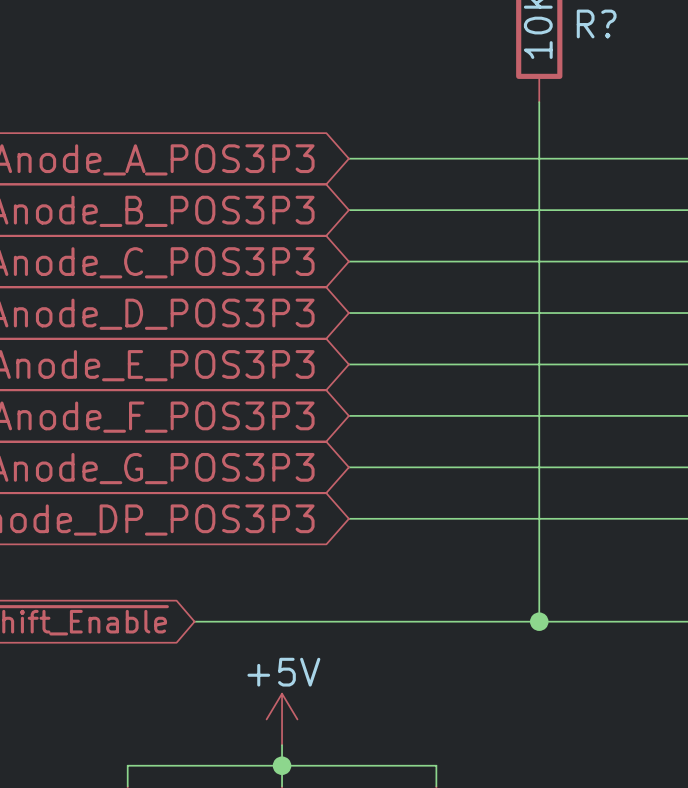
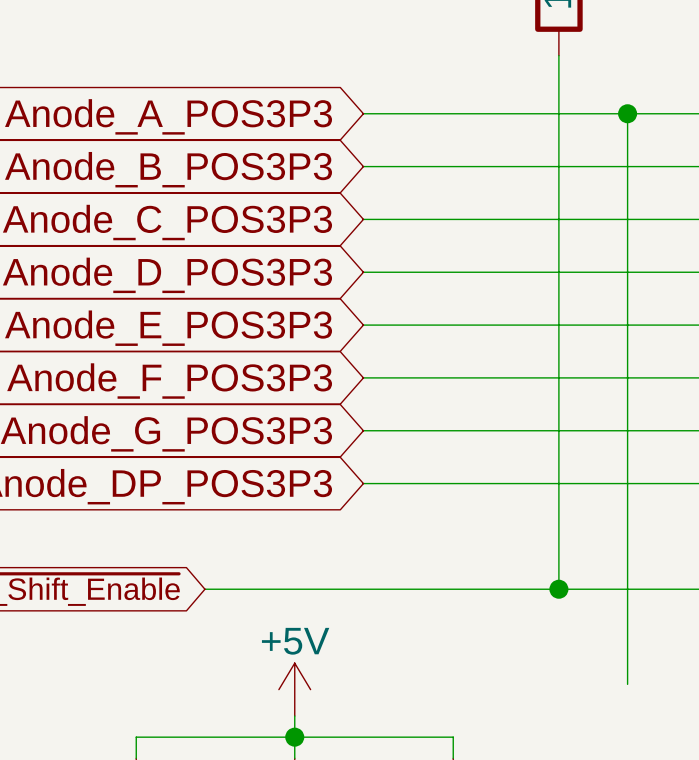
wire: none -> (627, 113) (627, 684)
junction: none -> (627, 113)

